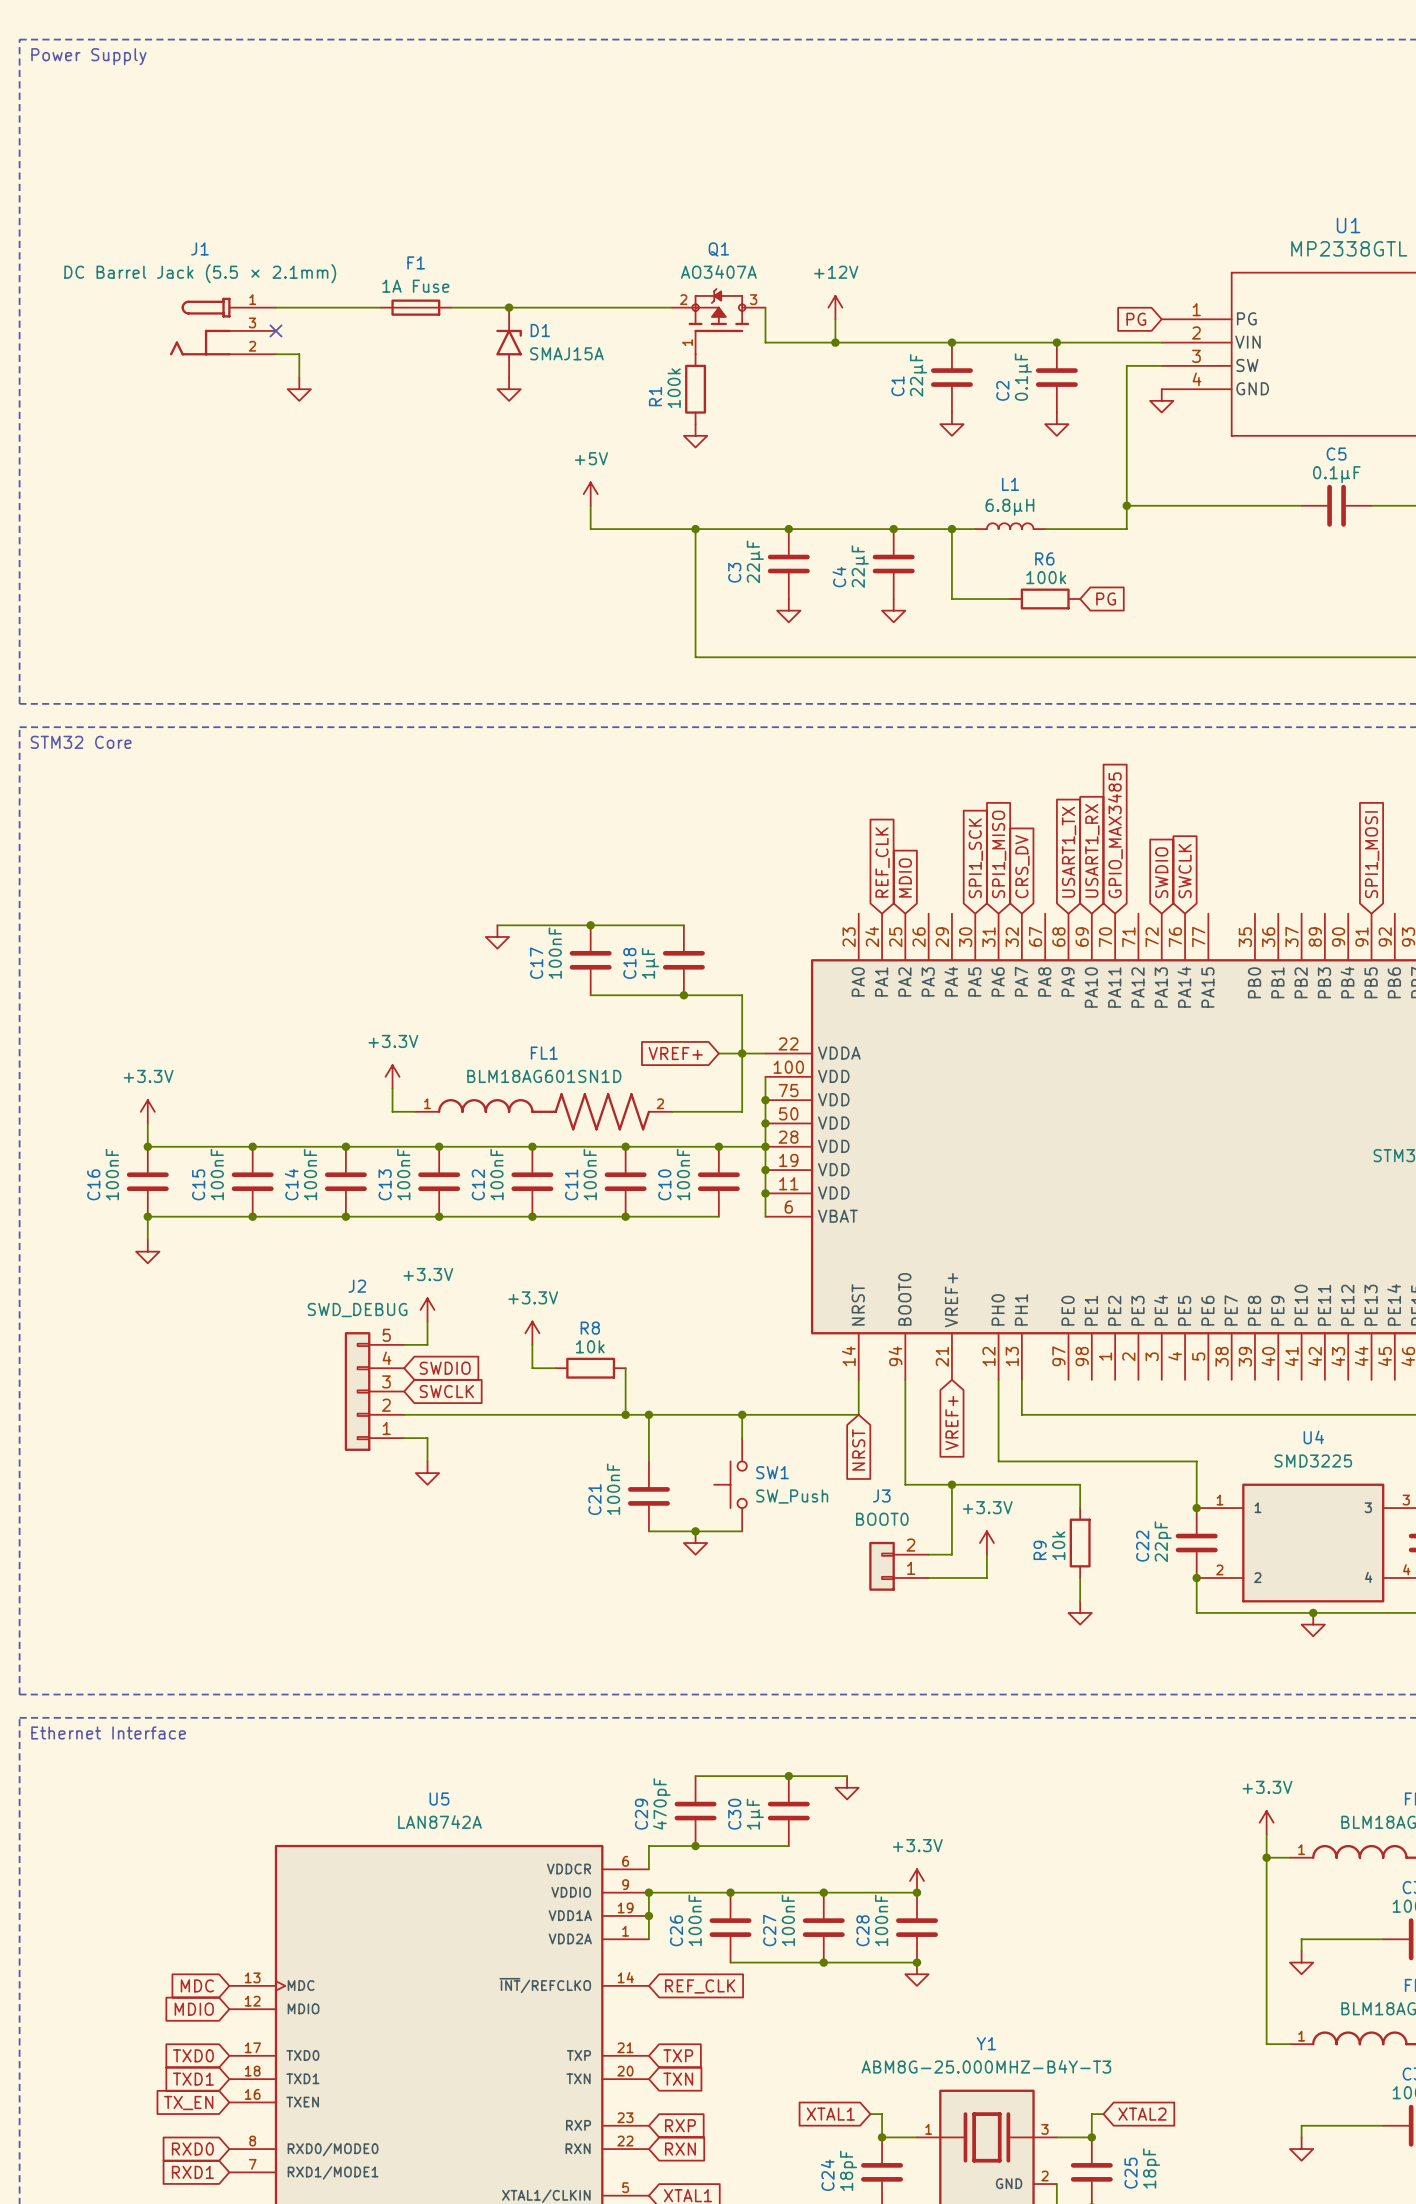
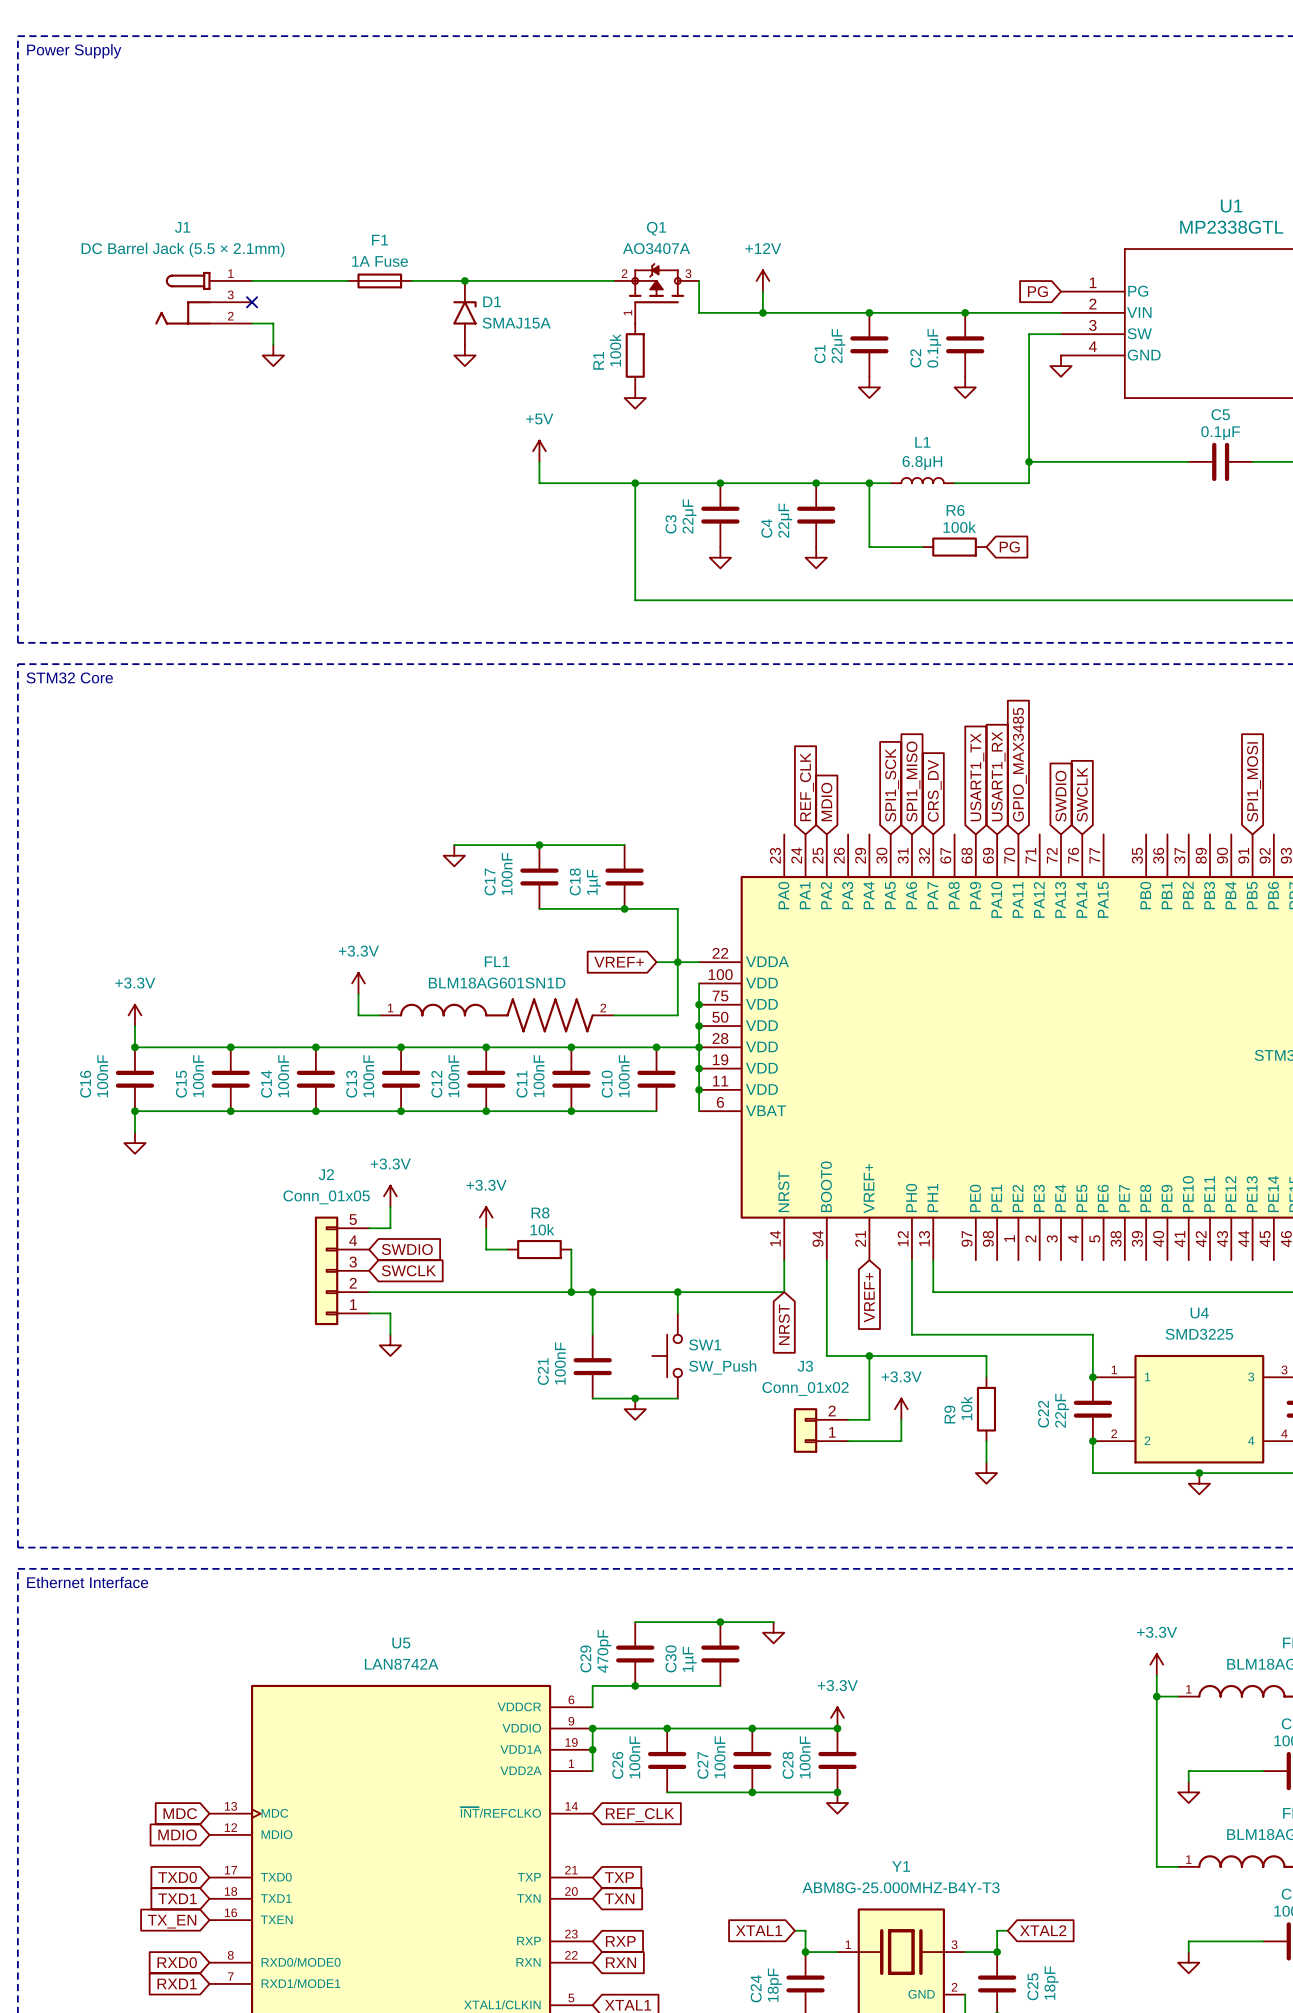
J2 value: SWD_DEBUG (357, 1310) -> Conn_01x05 (326, 1197)
J3 value: BOOT0 (882, 1519) -> Conn_01x02 (805, 1388)

